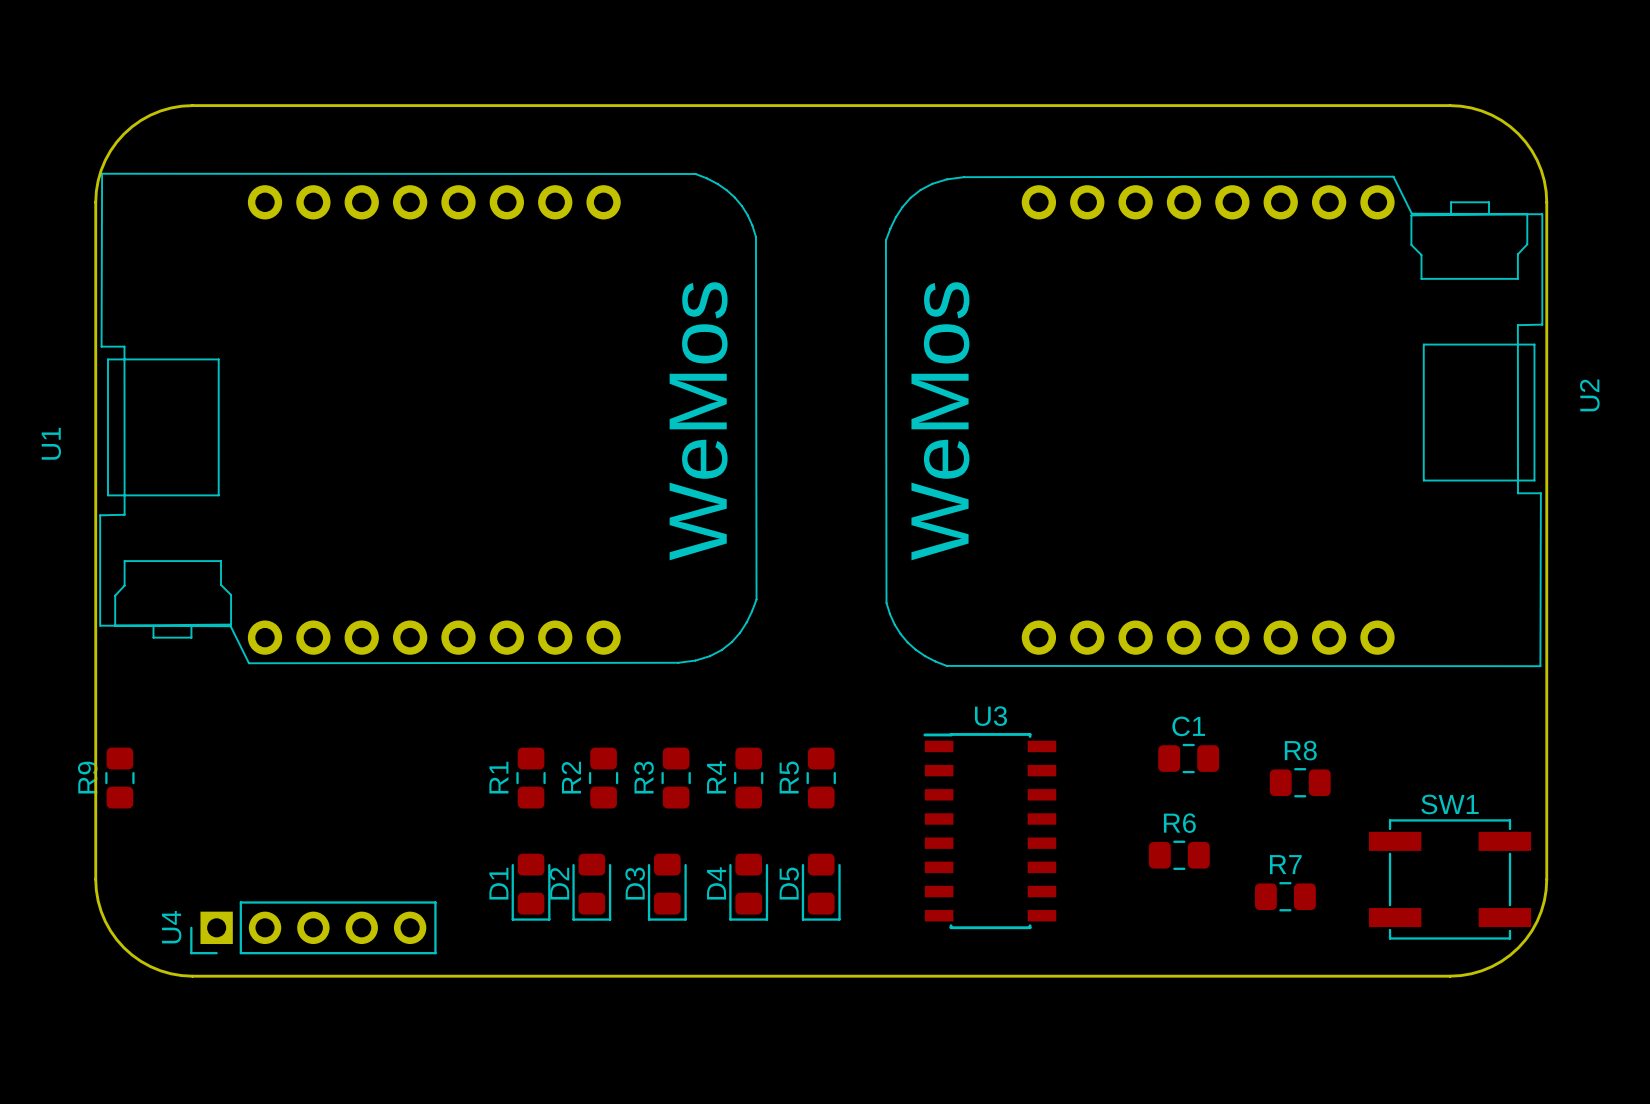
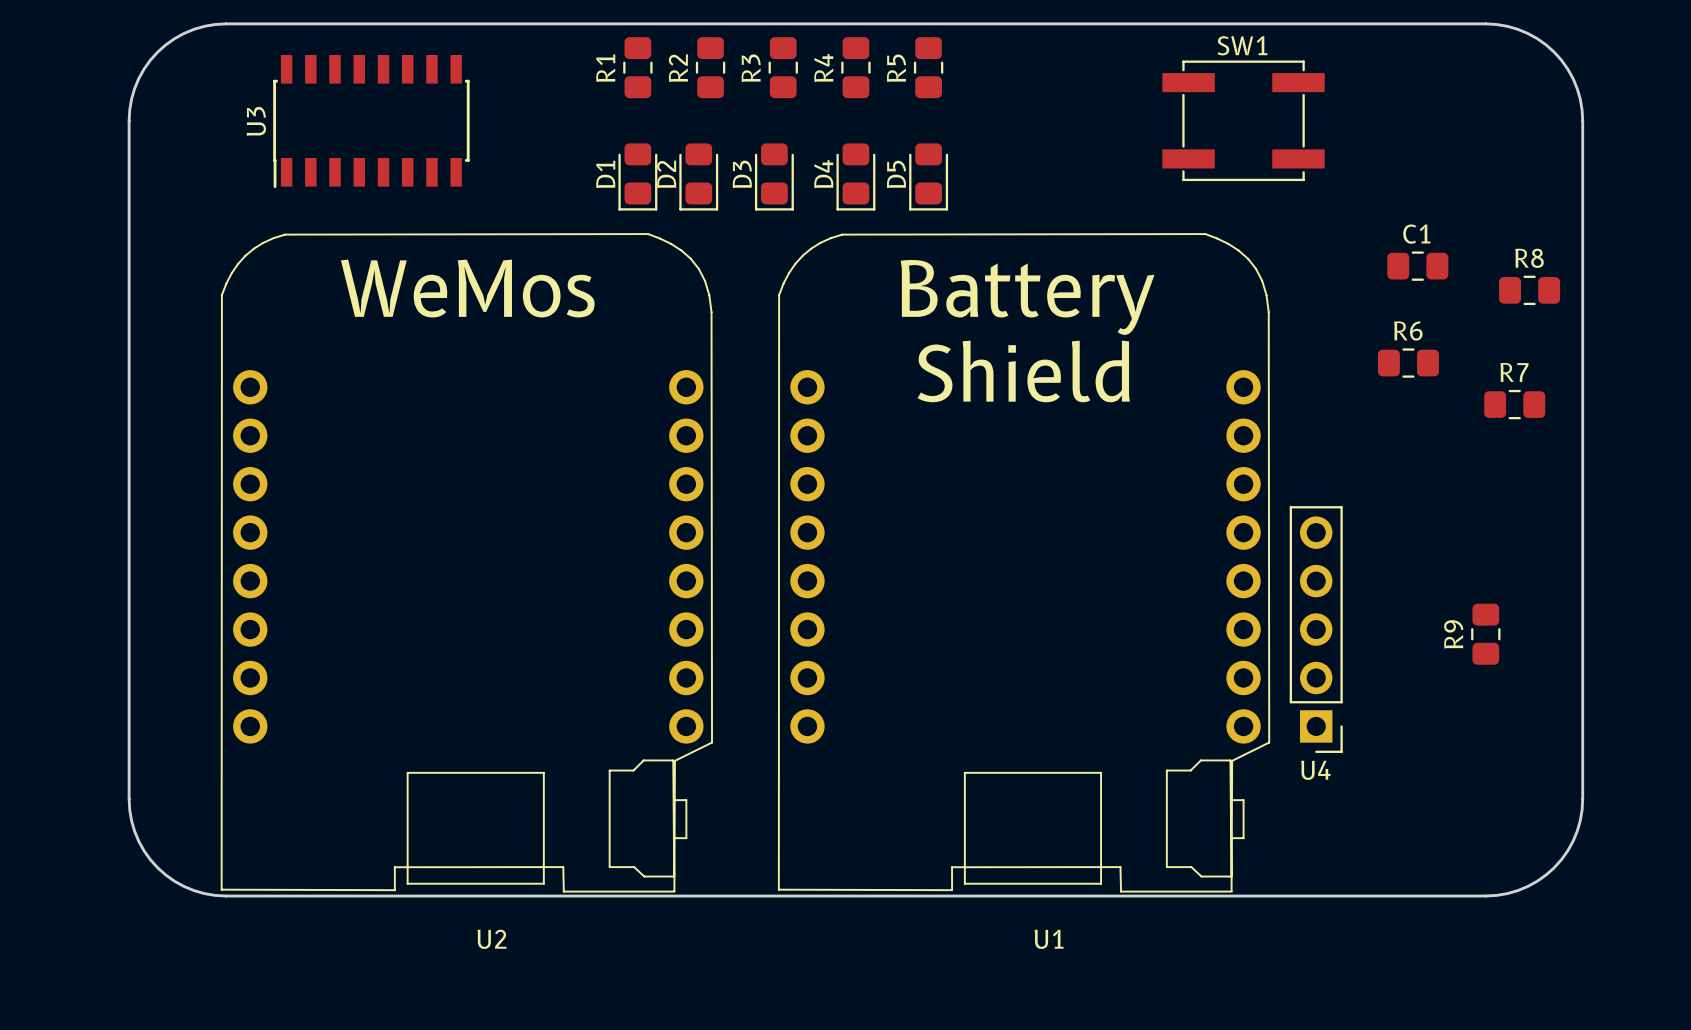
U1 footprint: [99, 172, 758, 665] -> [777, 233, 1271, 893]
U2 rotation: 0° (1214, 421) -> 90° clockwise (466, 562)
U2 position: (1214, 421) -> (466, 562)
U1 name position: U1 (51, 443) -> U1 (1049, 939)
C1 position: (1188, 758) -> (1417, 266)
R9 position: (119, 778) -> (1485, 634)
R1 position: (531, 778) -> (637, 67)
R2 position: (603, 778) -> (710, 67)
R3 position: (676, 778) -> (783, 67)
R4 position: (748, 778) -> (855, 67)
R5 position: (821, 778) -> (928, 67)
R8 position: (1300, 782) -> (1529, 290)
U3 rotation: 0° (989, 831) -> 90° counterclockwise (371, 121)
U3 position: (989, 831) -> (371, 121)
R6 position: (1179, 855) -> (1408, 363)
SW1 position: (1450, 879) -> (1243, 120)
D1 position: (531, 887) -> (637, 176)
D2 position: (591, 887) -> (698, 176)
D3 position: (667, 887) -> (774, 176)
D4 position: (748, 887) -> (855, 176)
D5 position: (821, 887) -> (928, 176)
R7 position: (1285, 896) -> (1514, 404)
U4 rotation: 0° (313, 927) -> 90° counterclockwise (1316, 629)
U4 position: (313, 927) -> (1316, 629)

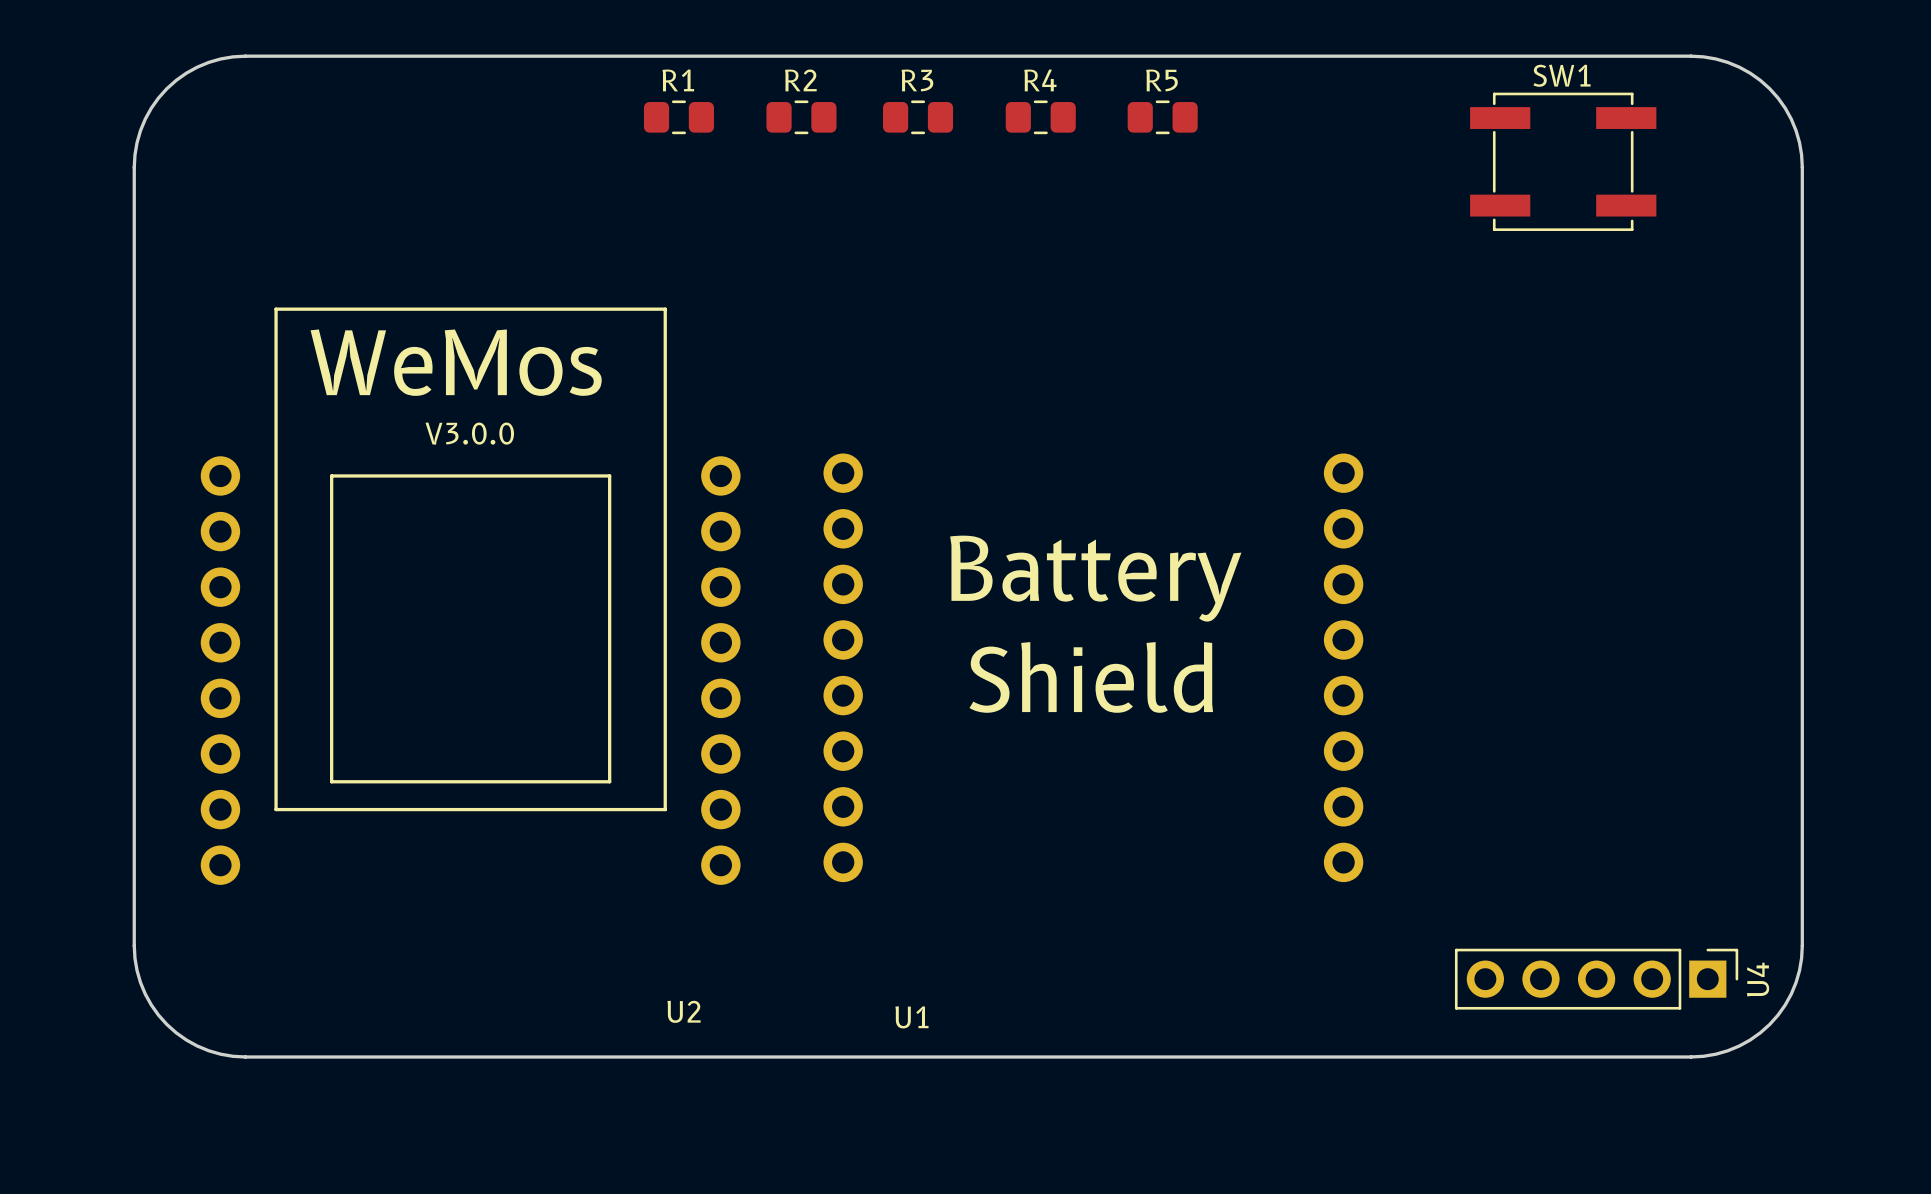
R1 rotation: 0° (637, 67) -> 90° clockwise (678, 117)
R2 rotation: 0° (710, 67) -> 90° clockwise (801, 117)
R3 rotation: 0° (783, 67) -> 90° clockwise (918, 117)
R4 rotation: 0° (855, 67) -> 90° clockwise (1040, 117)
R4 position: (855, 67) -> (1040, 117)
R5 rotation: 0° (928, 67) -> 90° clockwise (1162, 117)
R5 position: (928, 67) -> (1162, 117)
SW1 position: (1243, 120) -> (1563, 161)
U3: (371, 121) -> none
D1: (637, 176) -> none
D2: (698, 176) -> none
D3: (774, 176) -> none
D4: (855, 176) -> none
D5: (928, 176) -> none
U2 footprint: [220, 233, 713, 893] -> [200, 307, 741, 885]
U1 footprint: [777, 233, 1271, 893] -> [823, 453, 1364, 883]
C1: (1417, 266) -> none
R8: (1529, 290) -> none
R6: (1408, 363) -> none
R7: (1514, 404) -> none
U4 rotation: 0° (1316, 629) -> 90° counterclockwise (1596, 979)
U4 position: (1316, 629) -> (1596, 979)
R9: (1485, 634) -> none
U2 name position: U2 (491, 939) -> U2 (684, 1011)
U1 name position: U1 (1049, 939) -> U1 (911, 1017)

